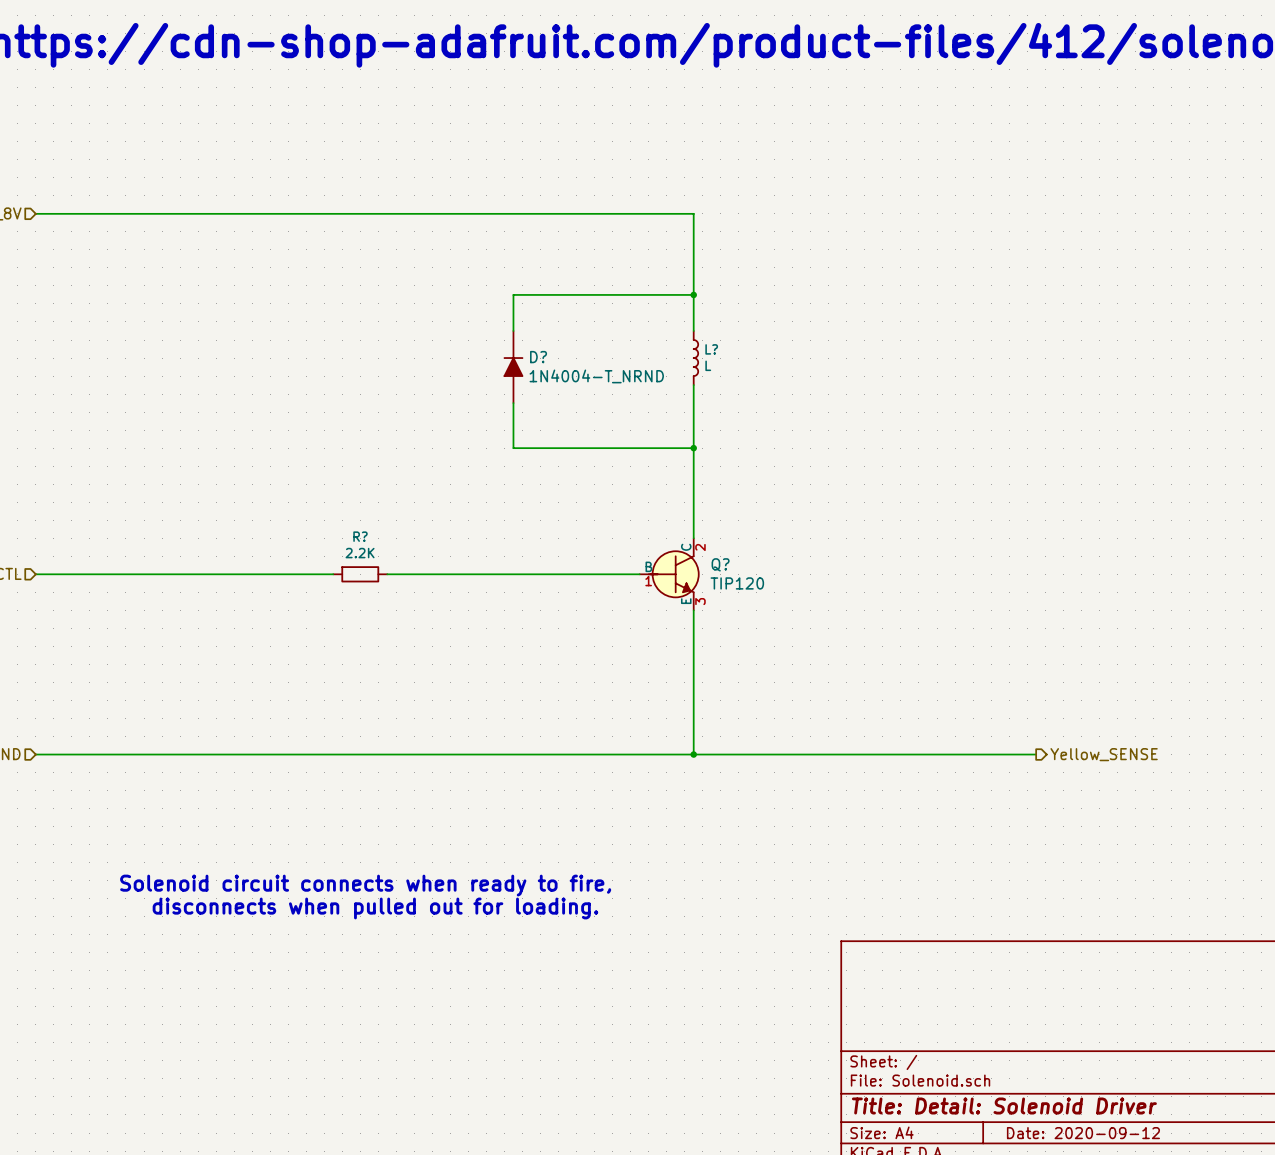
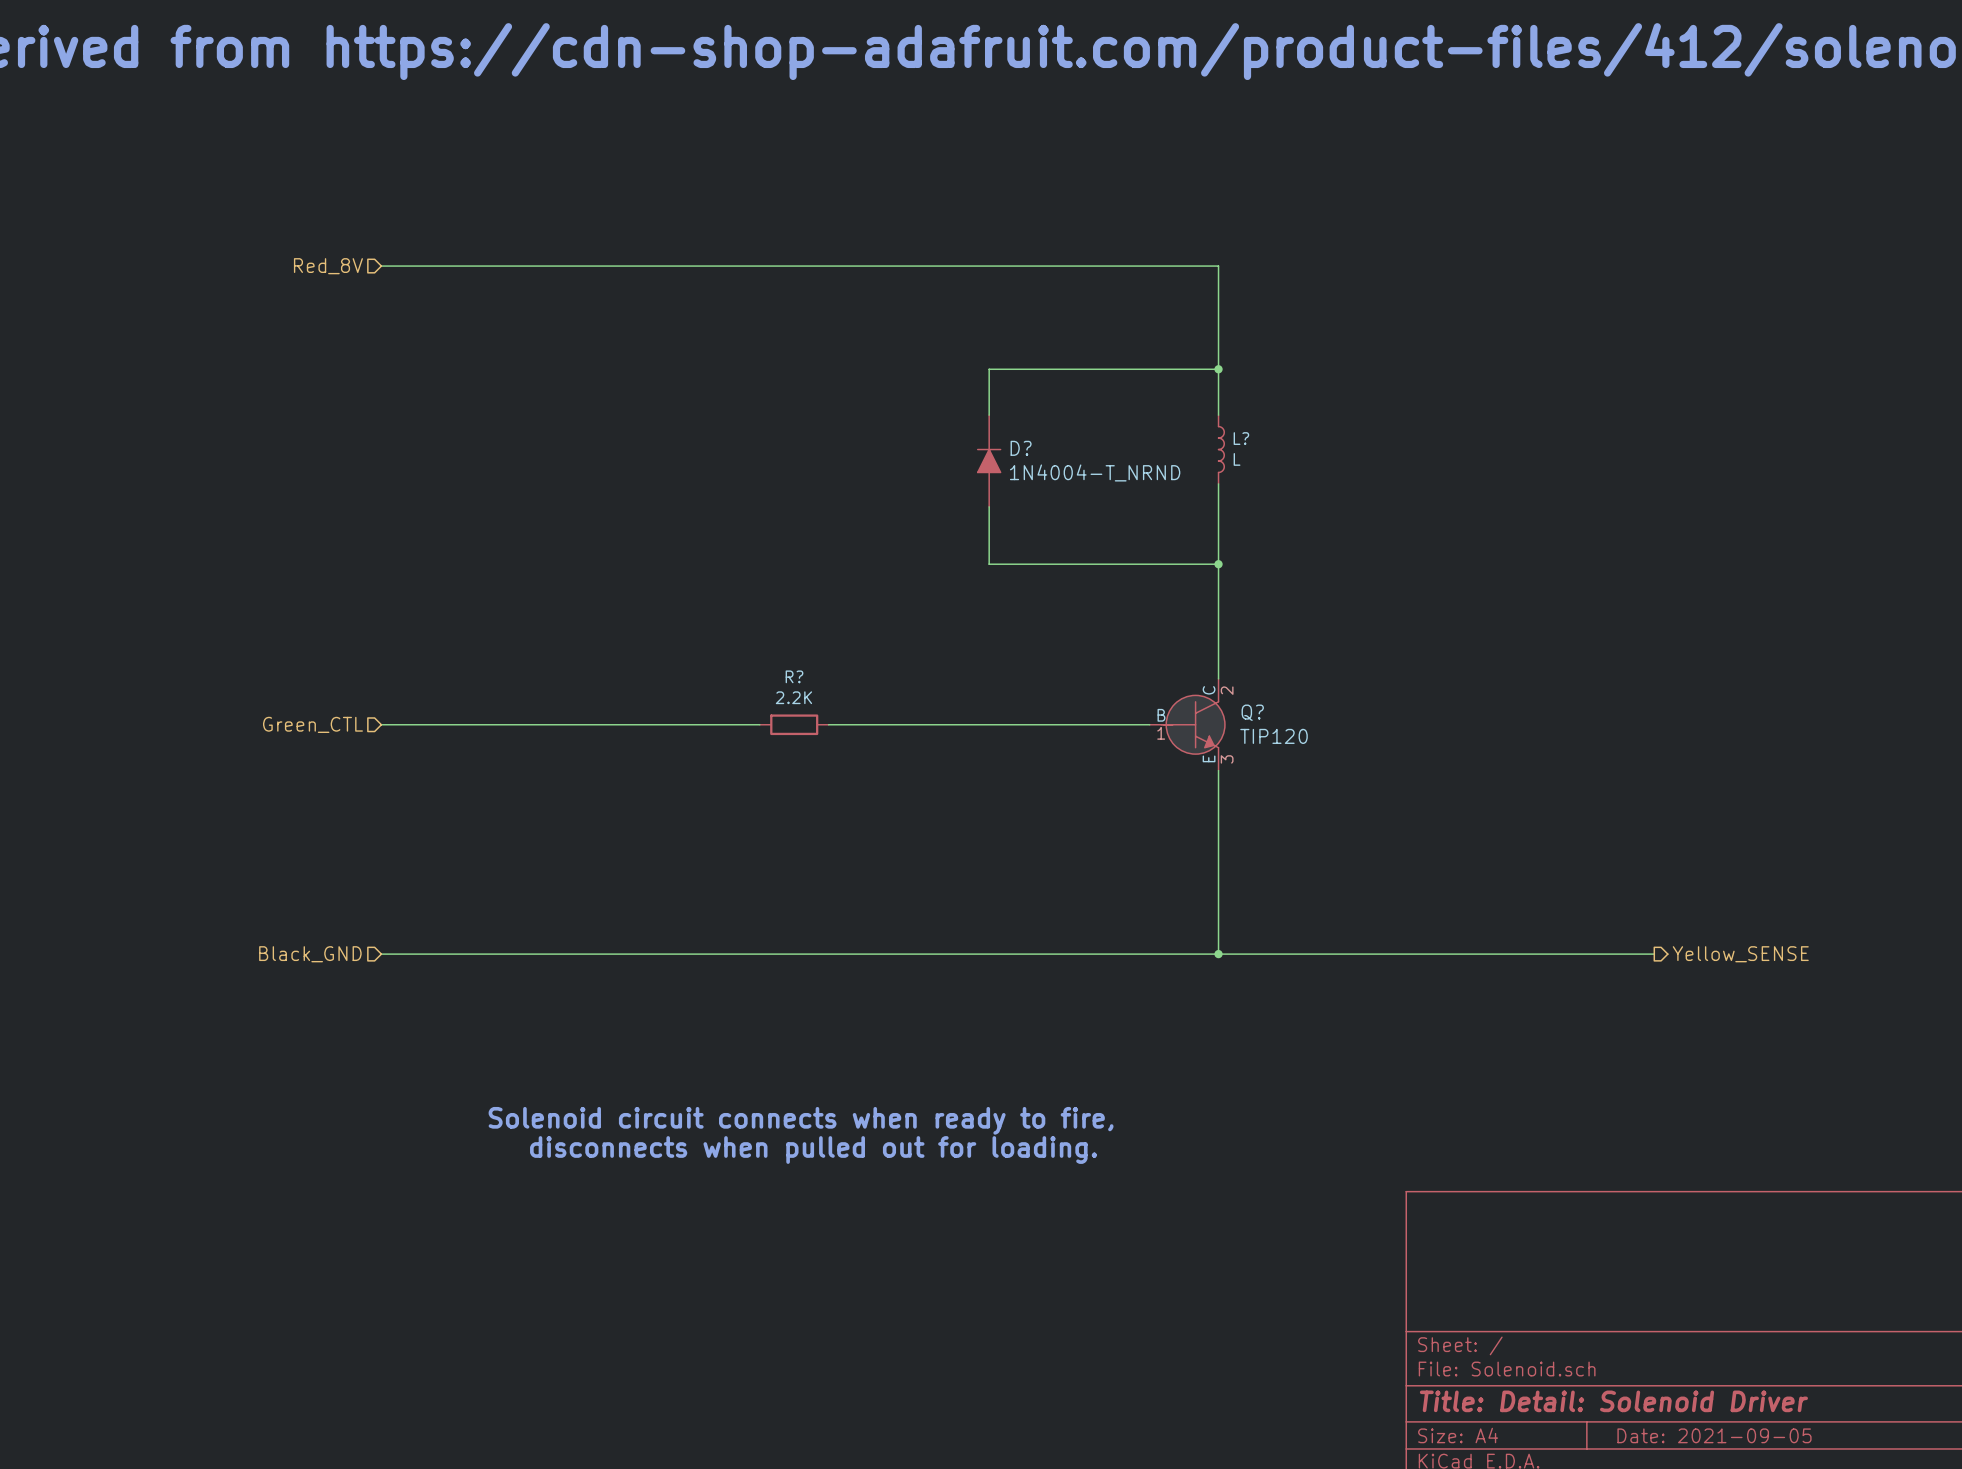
title block: Date: 2020-09-12 (1083, 1133) -> Date: 2021-09-05 (1714, 1435)

